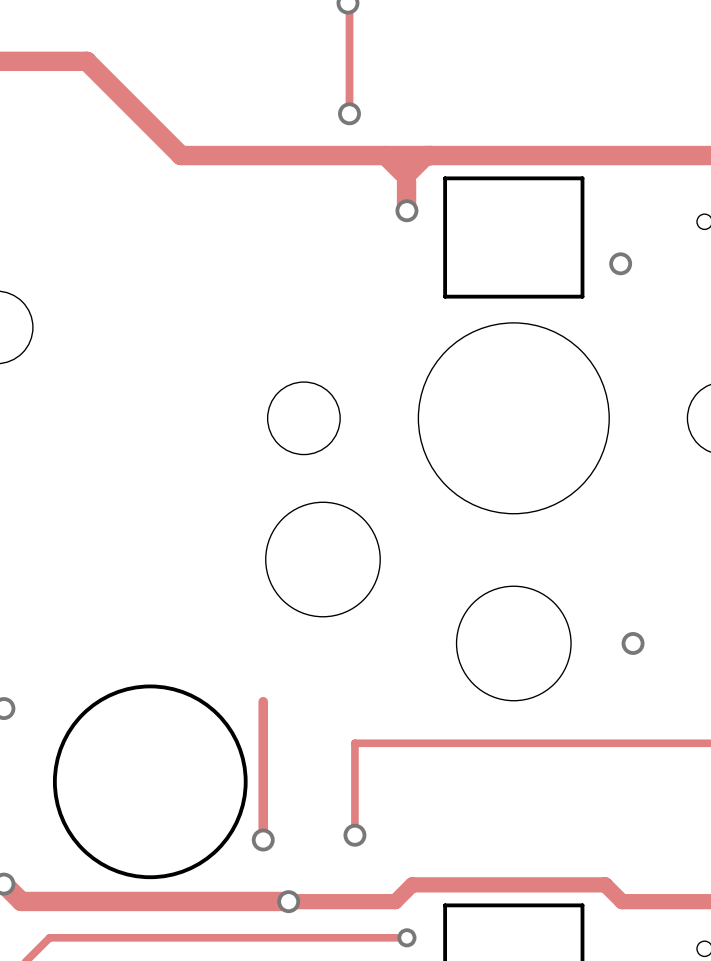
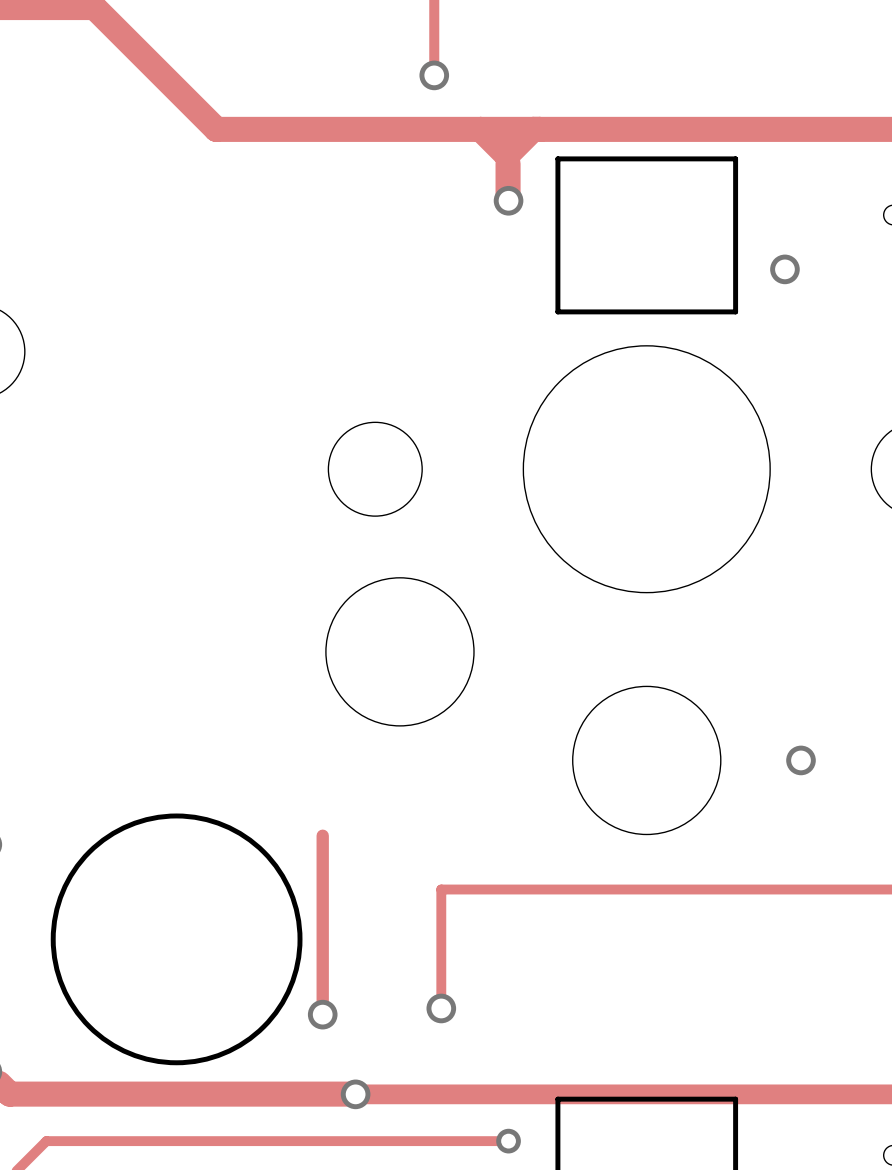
track: (395, 901) (412, 884) (605, 884) (622, 901) -> (493, 1094) (786, 1094)

